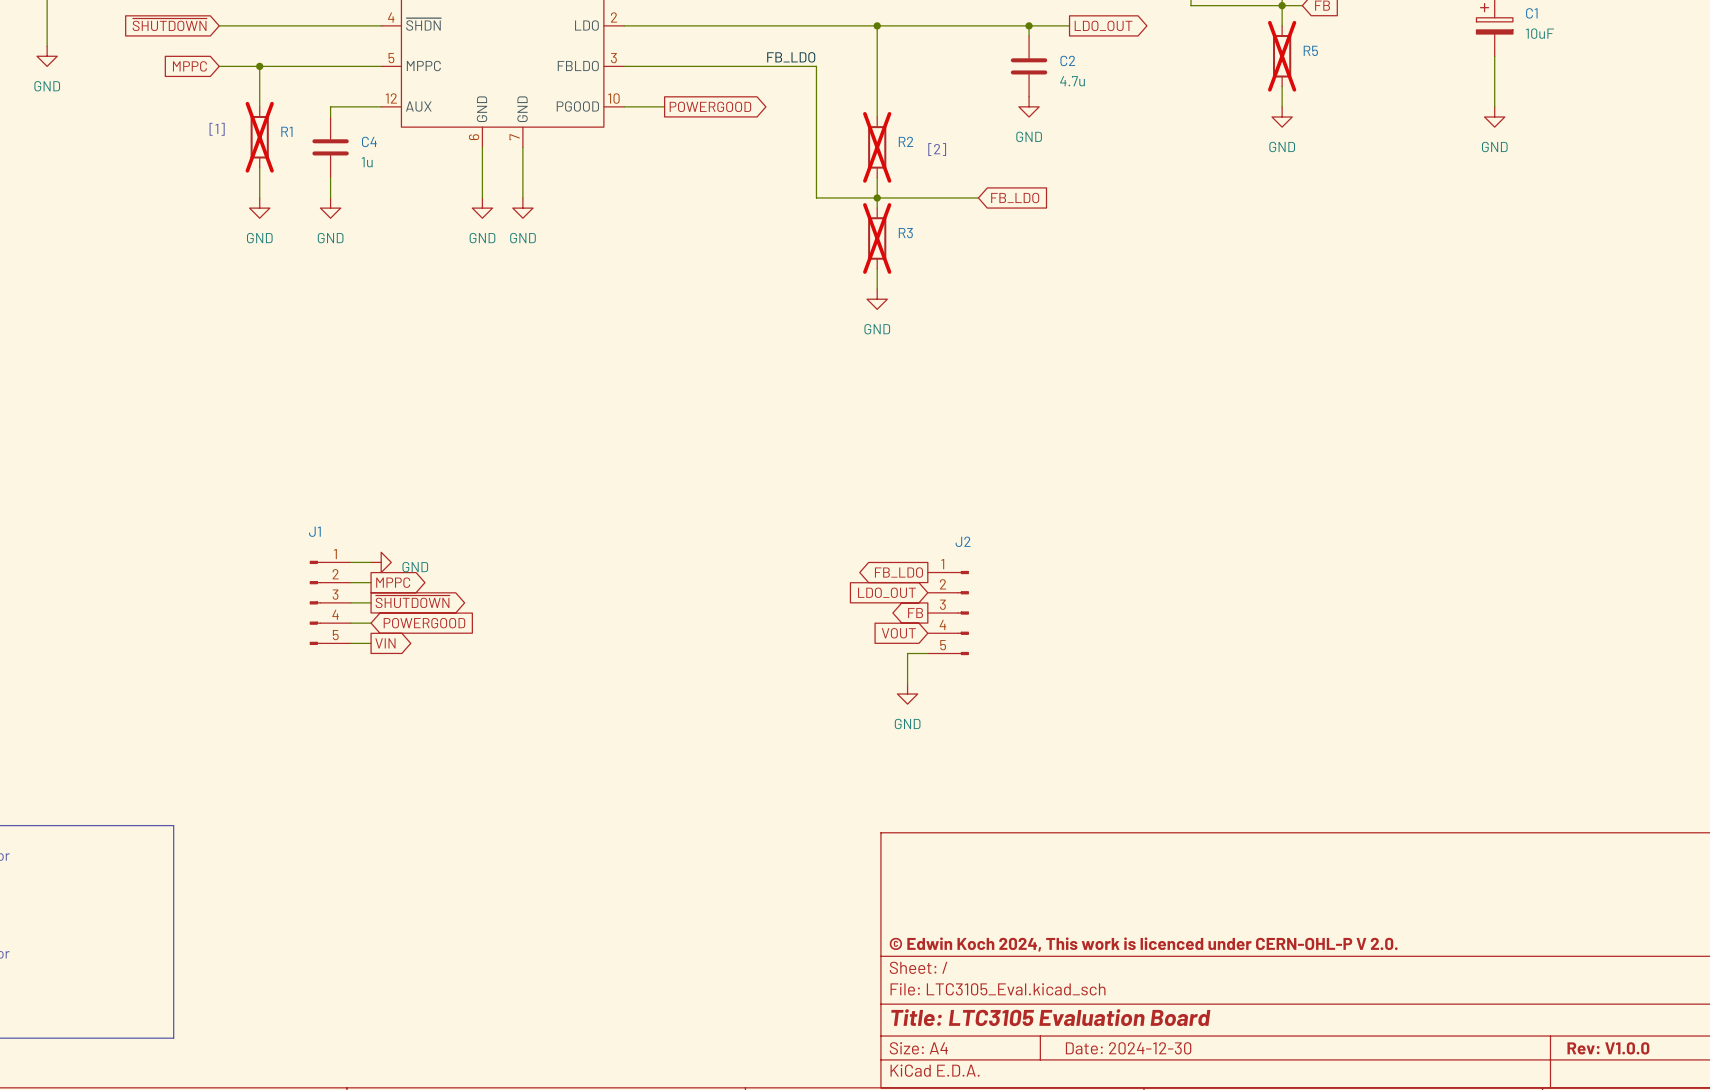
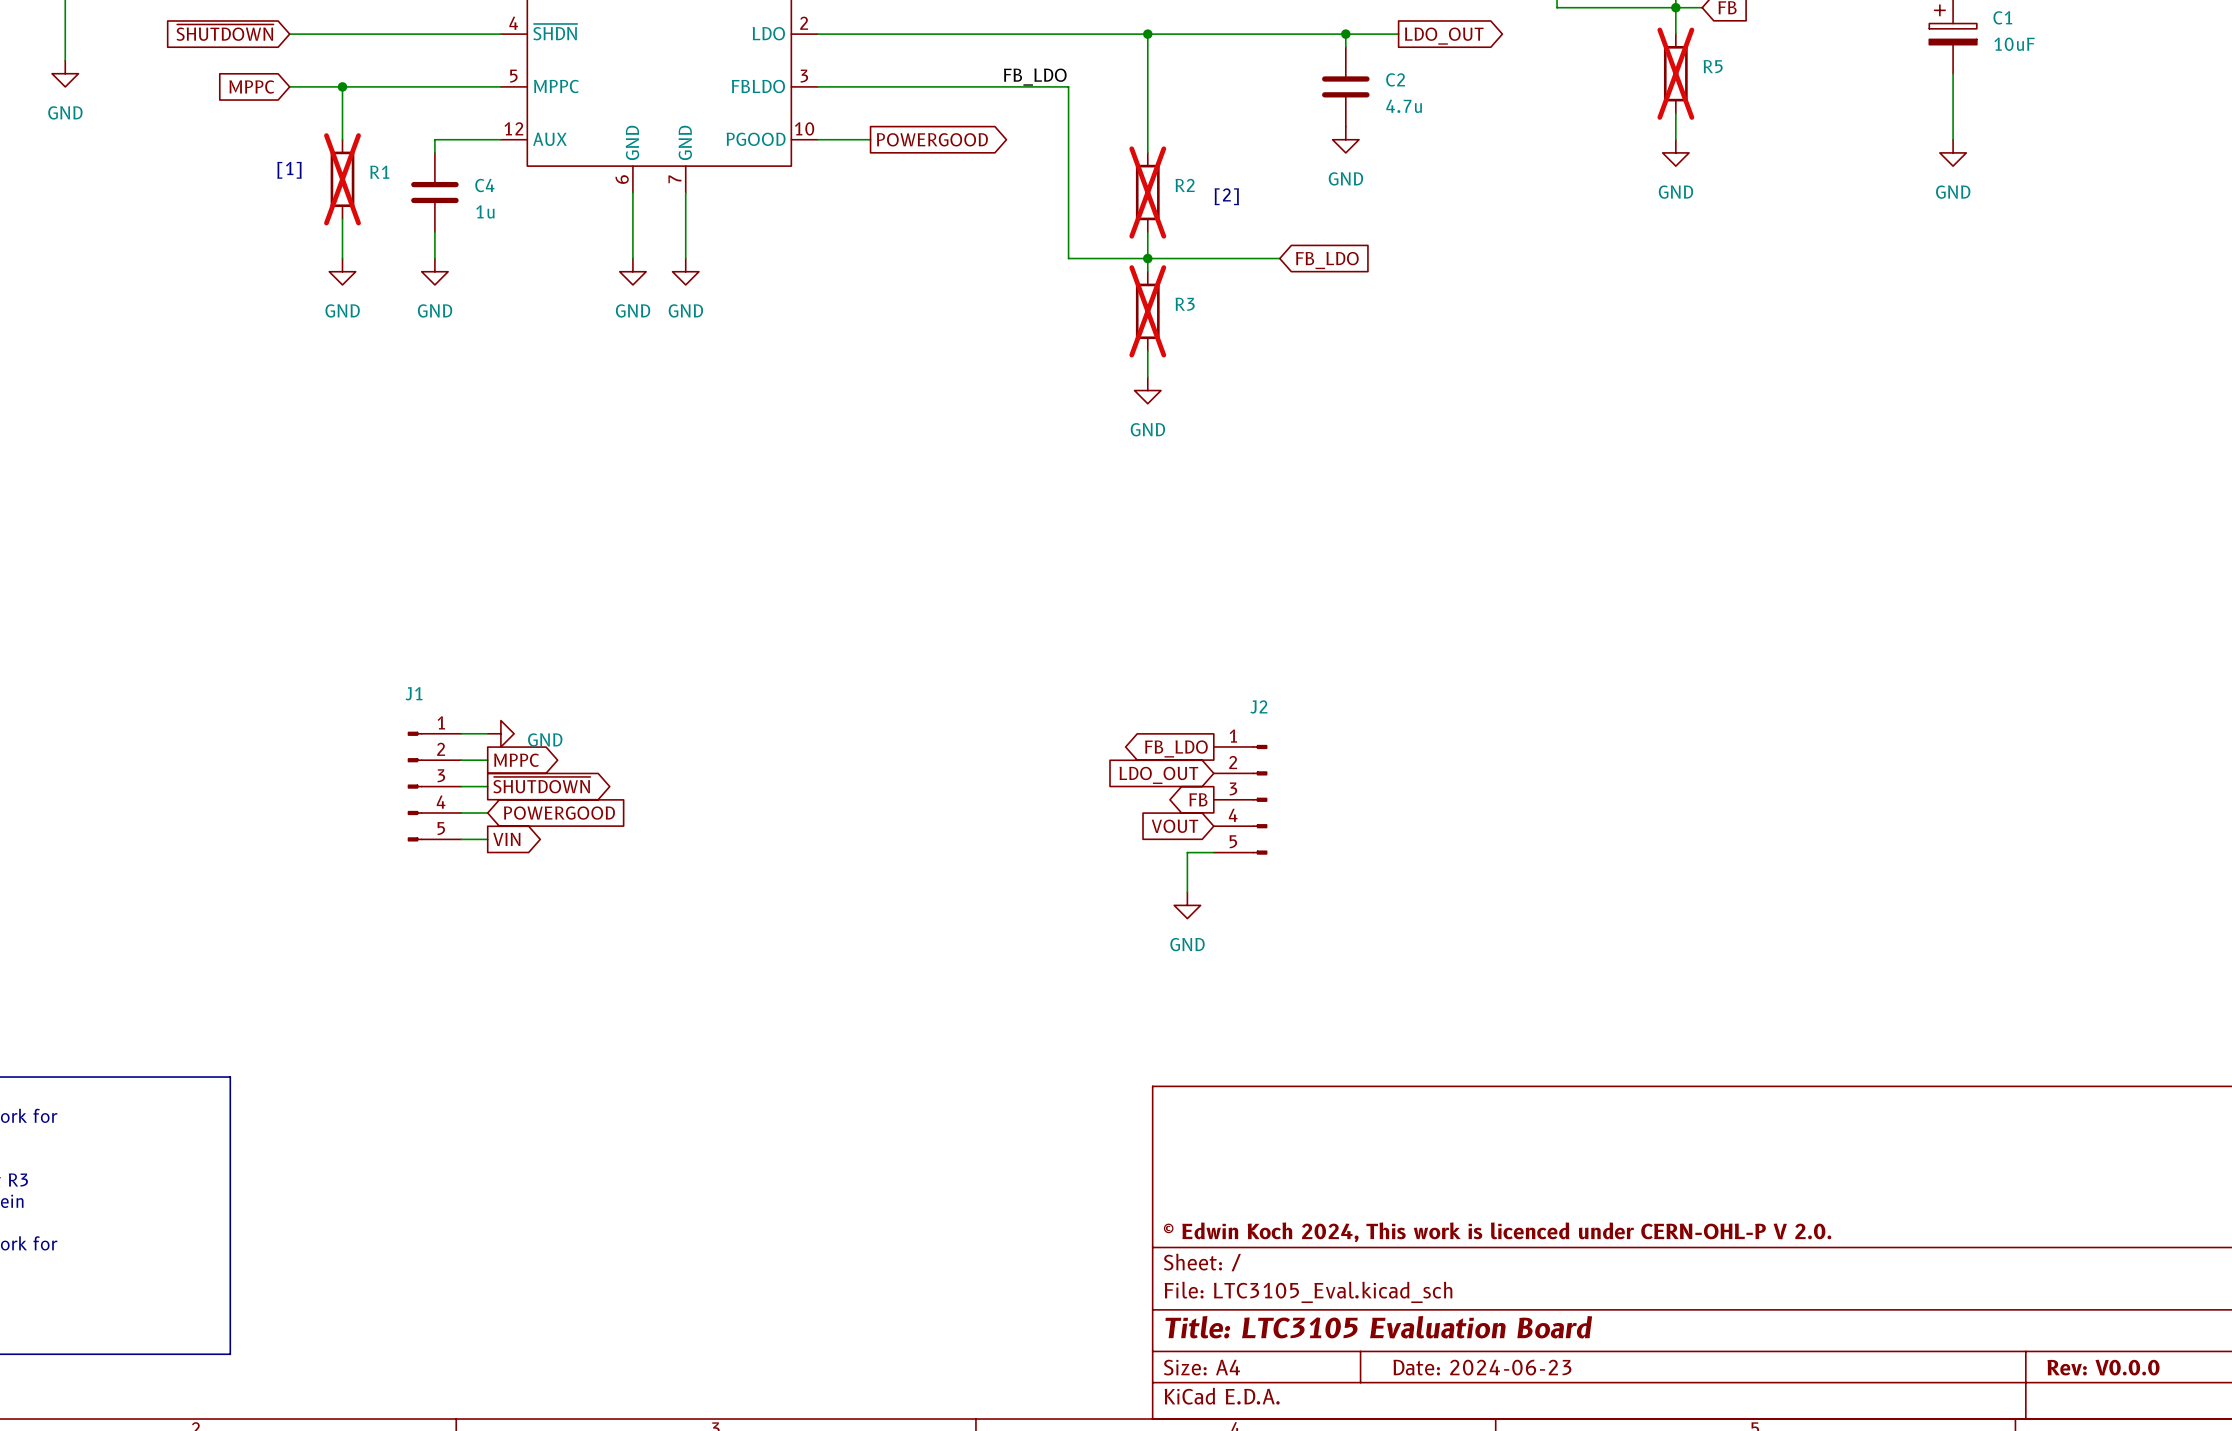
title block: Date: 2024-12-30 (1128, 1048) -> Date: 2024-06-23 (1482, 1367)
title block: Rev: V1.0.0 (1608, 1048) -> Rev: V0.0.0 (2103, 1367)

